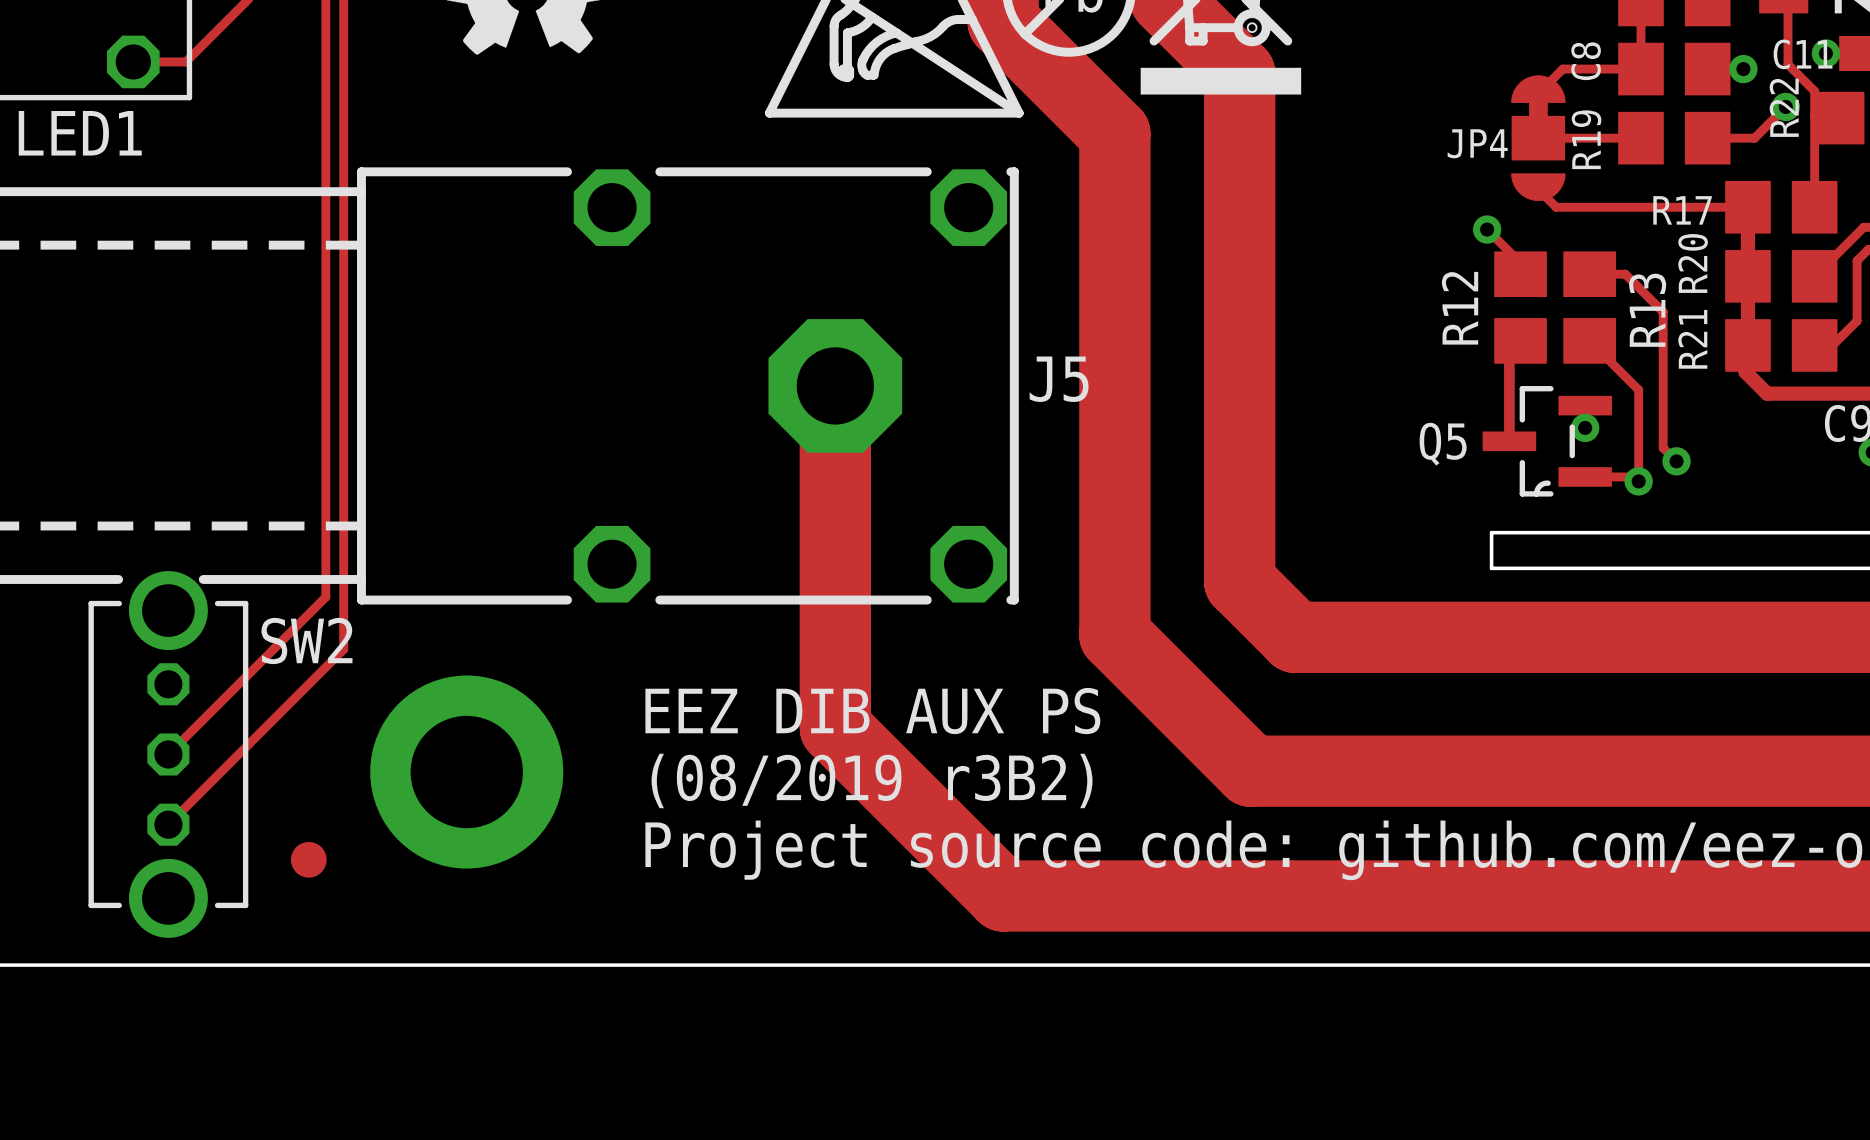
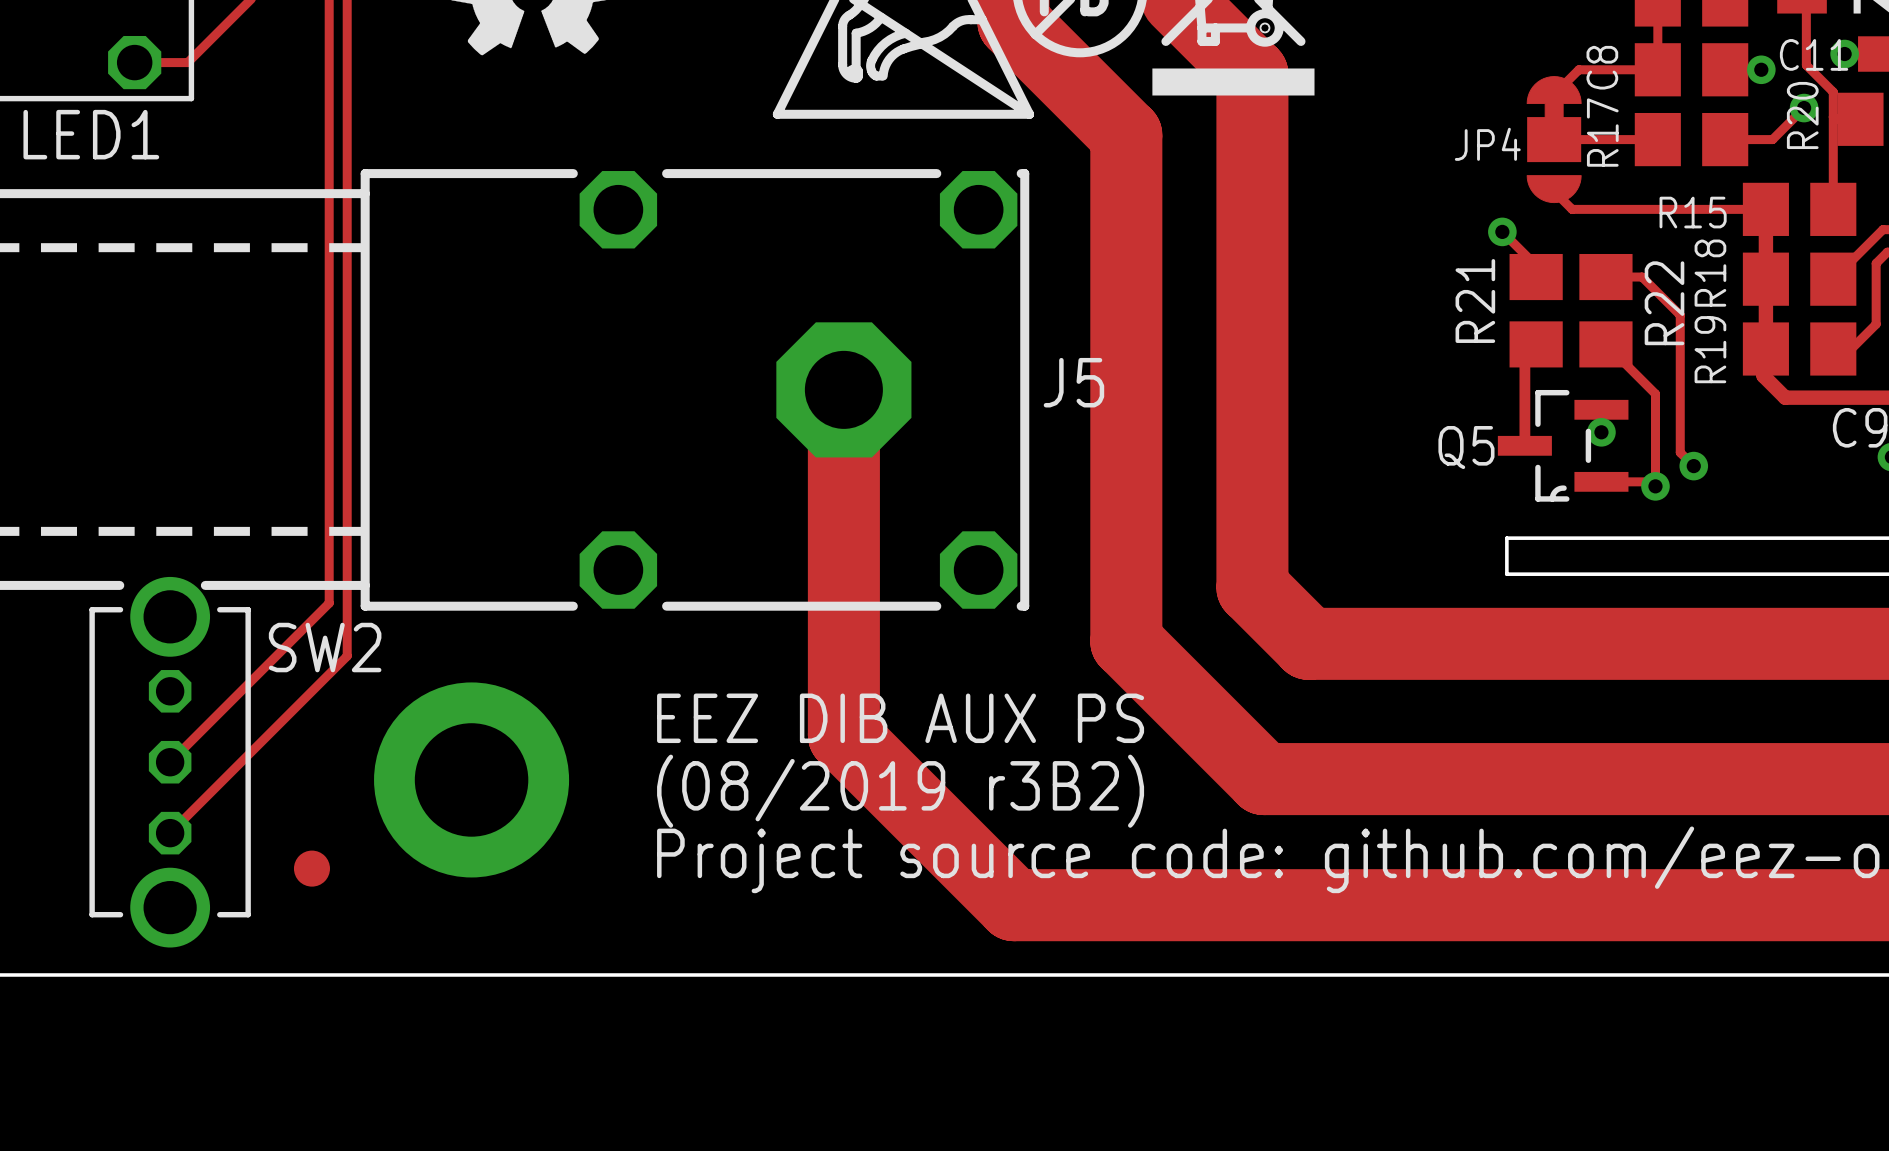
R22 name: R22 (1784, 107) -> R20 (1802, 115)
R19 name: R19 (1586, 139) -> R17 (1602, 132)
R17 name: R17 (1682, 210) -> R15 (1693, 212)
R20 name: R20 (1693, 263) -> R18 (1710, 273)
R12 name: R12 (1460, 308) -> R21 (1475, 301)
R13 name: R13 (1647, 310) -> R22 (1664, 303)
R21 name: R21 (1692, 339) -> R19 (1710, 349)

